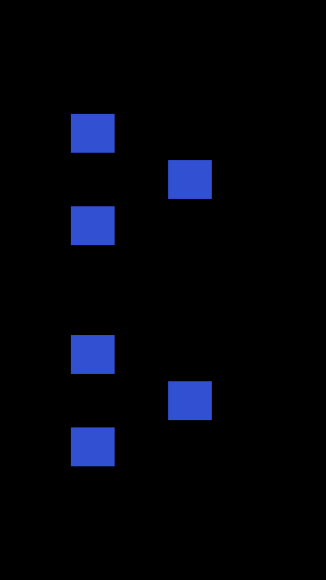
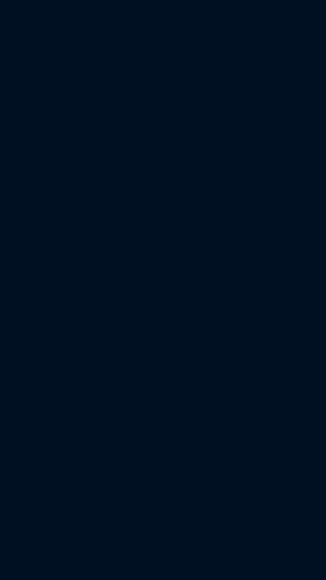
part: (141, 179) -> none
part: (141, 400) -> none

